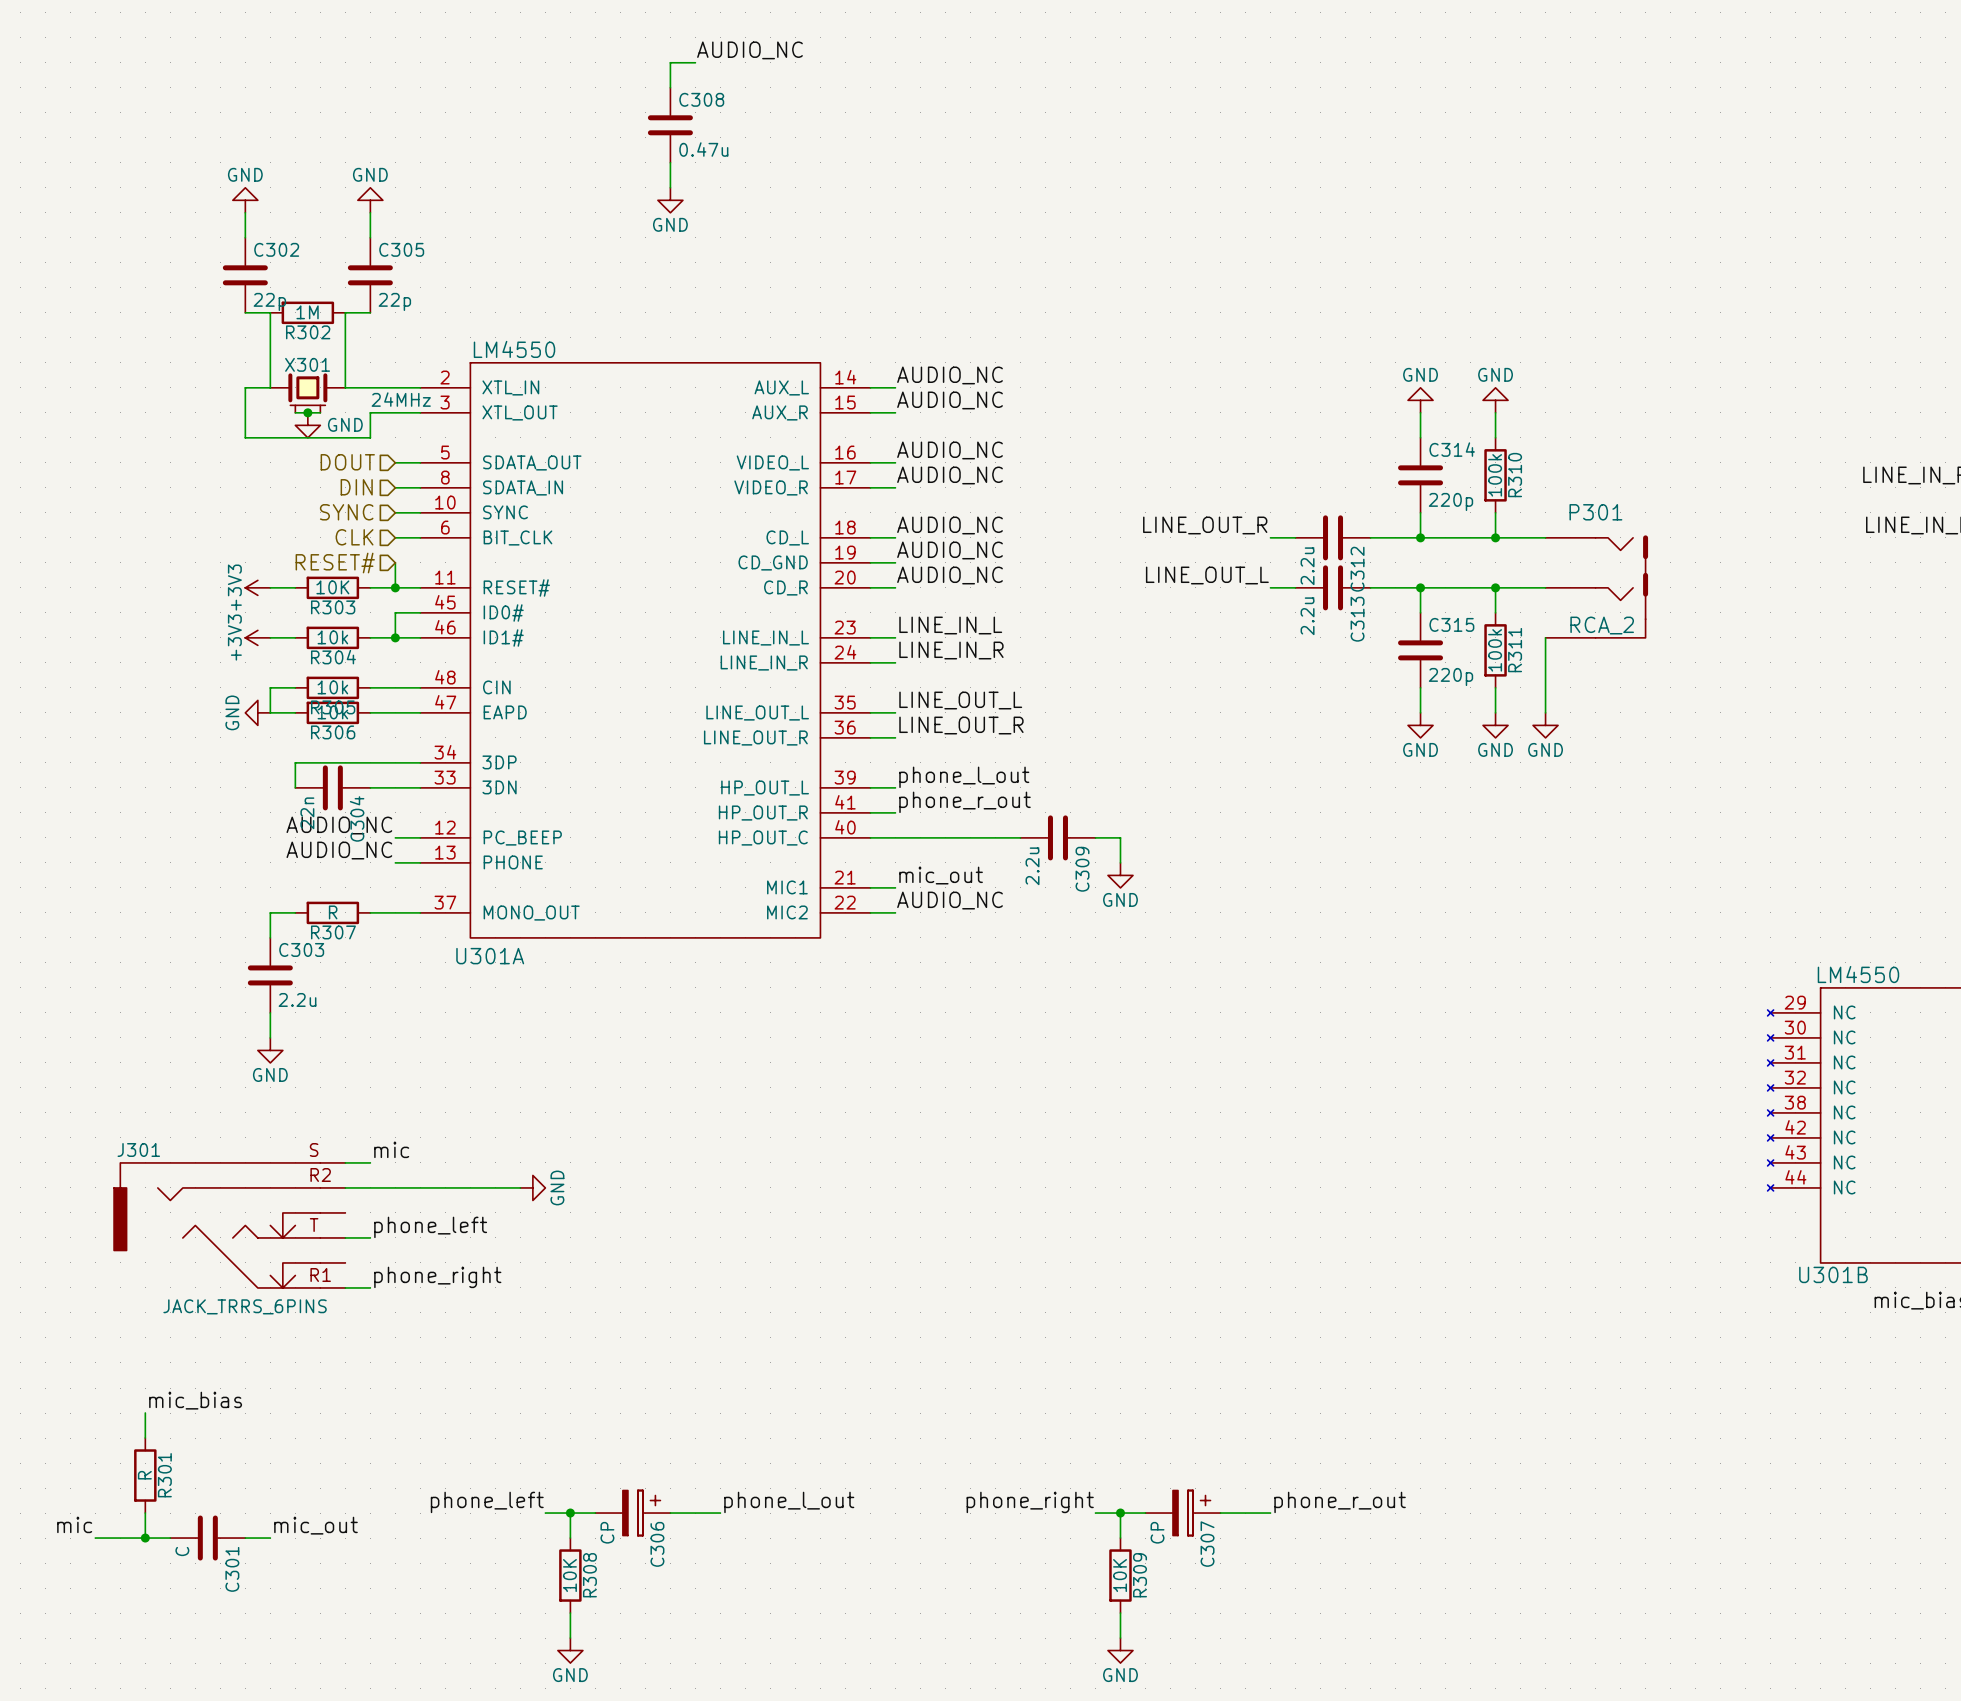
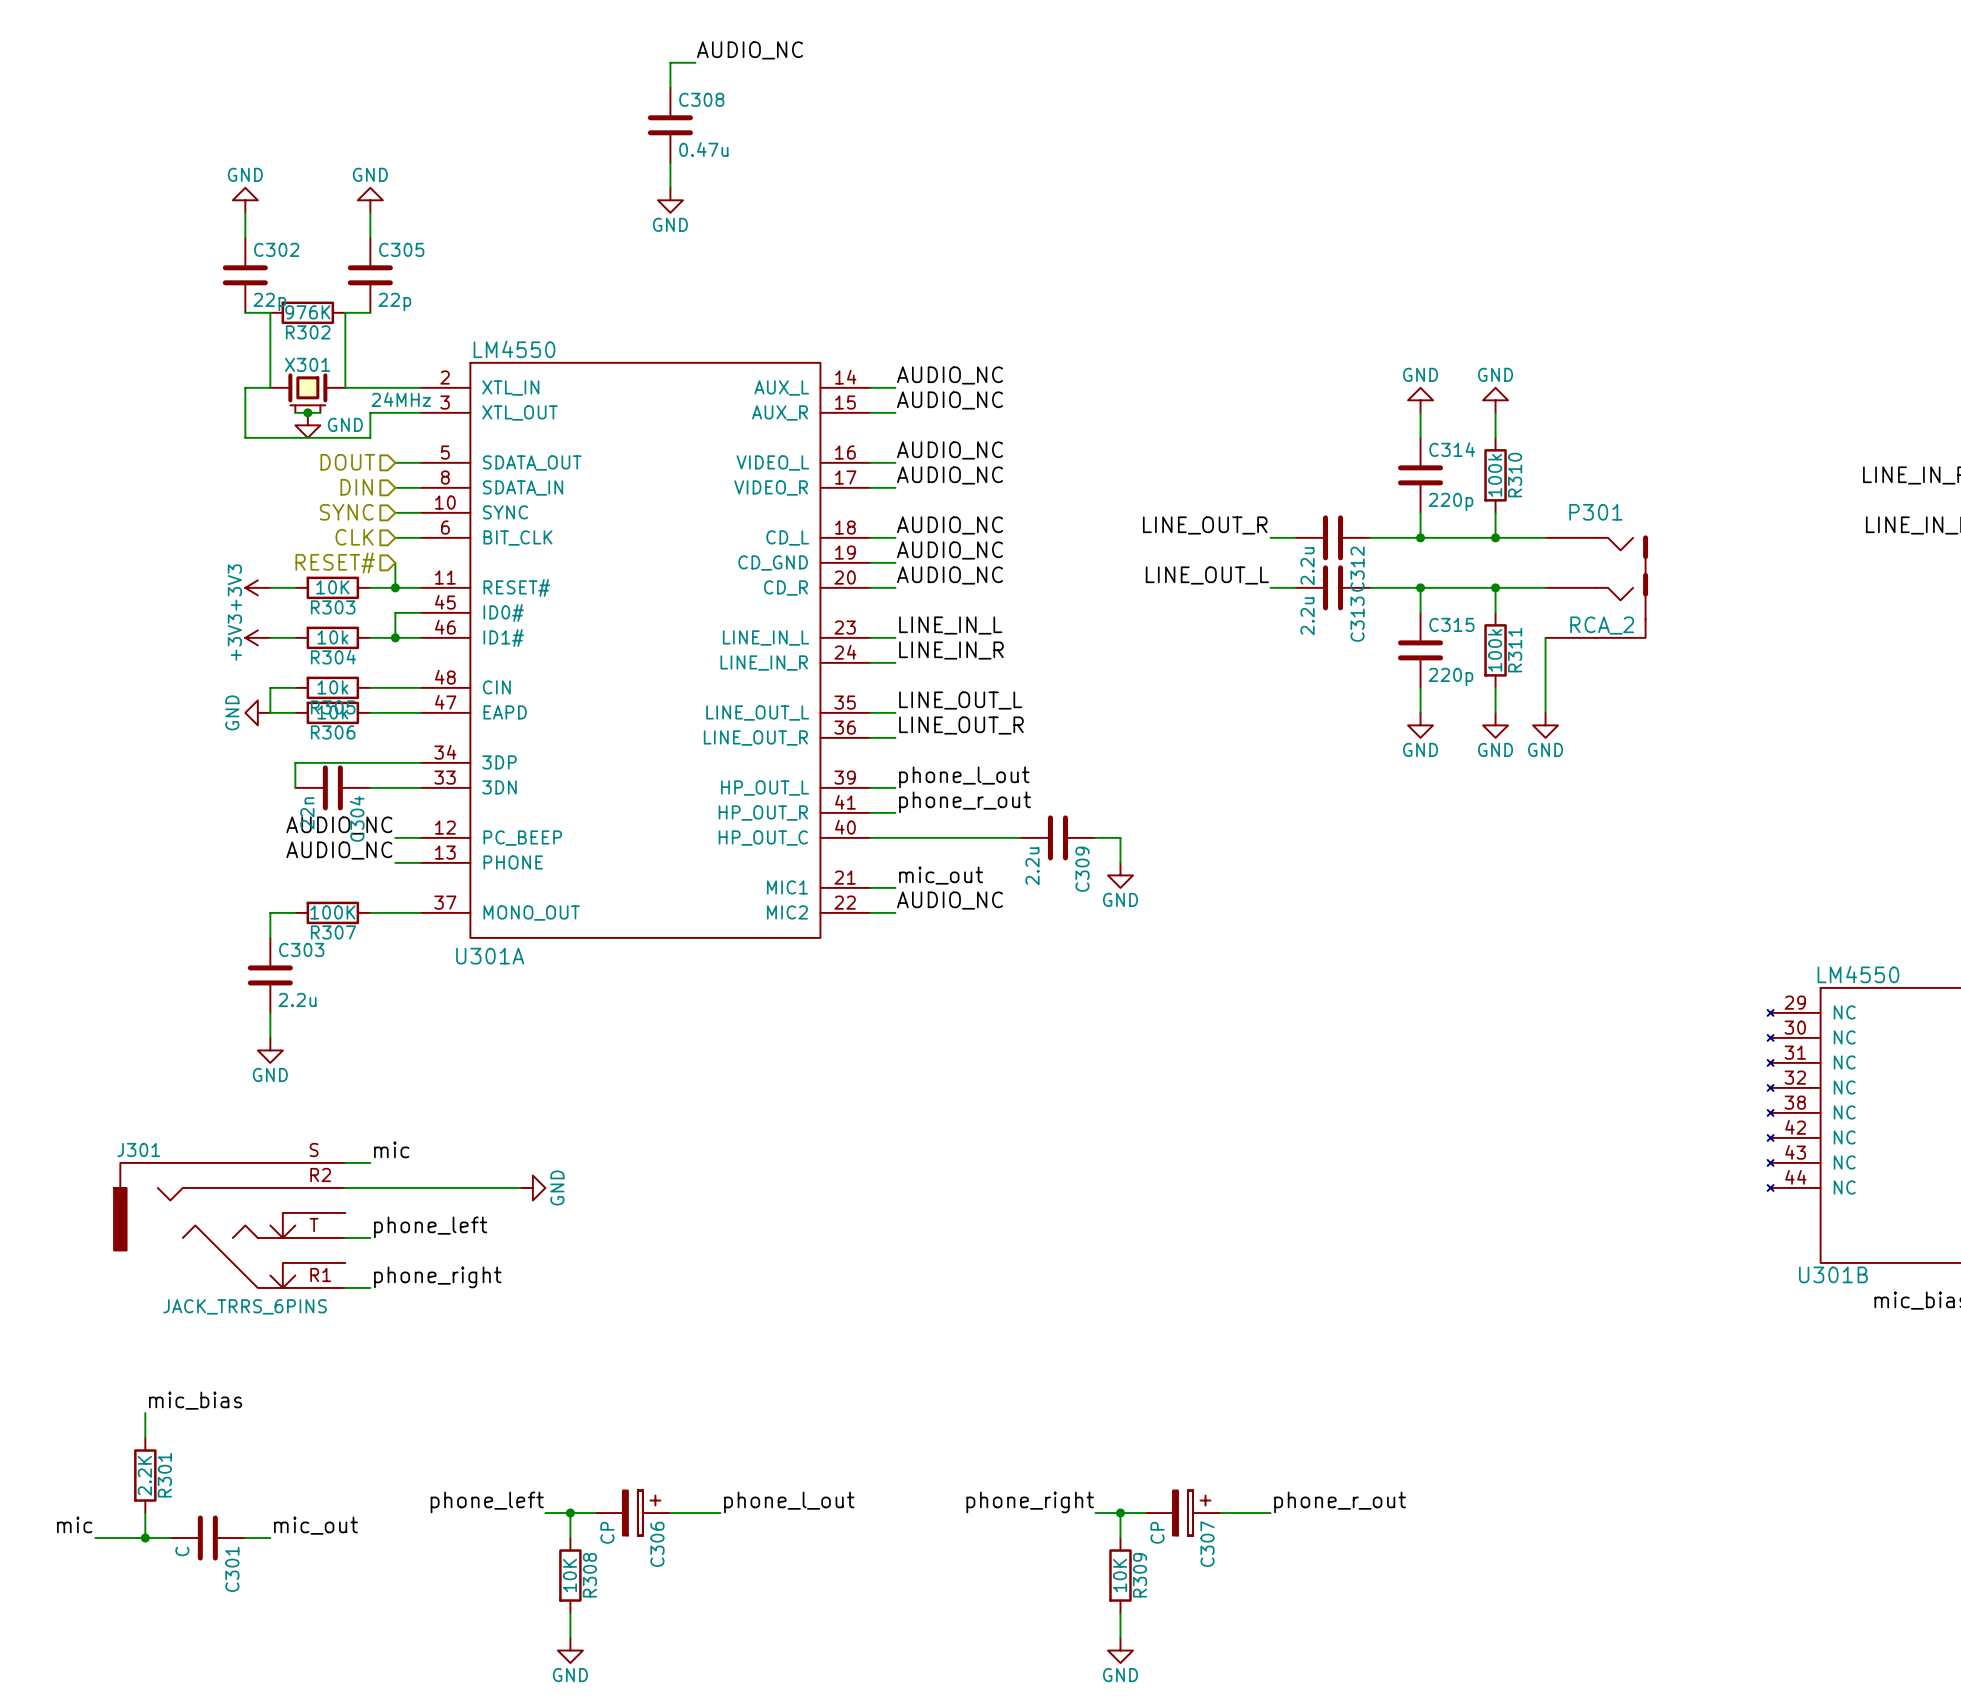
R302 value: 1M (307, 312) -> 976K (307, 312)
R307 value: R (333, 912) -> 100K (332, 912)
R301 value: R (144, 1475) -> 2.2K (144, 1475)

